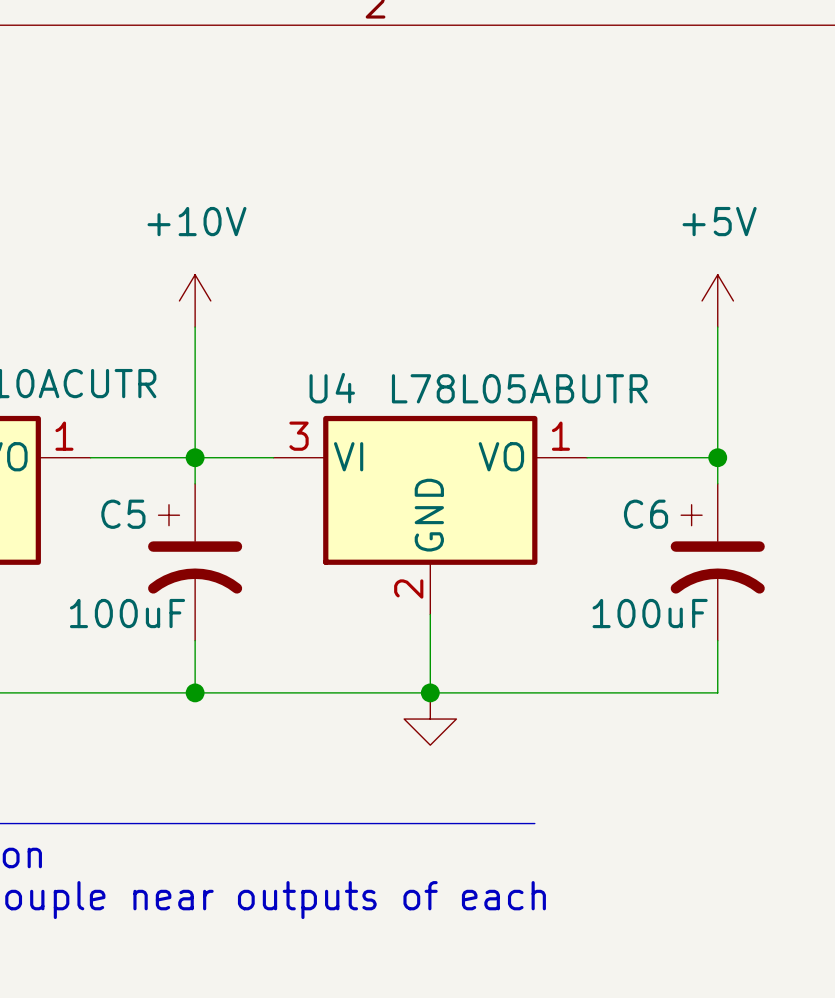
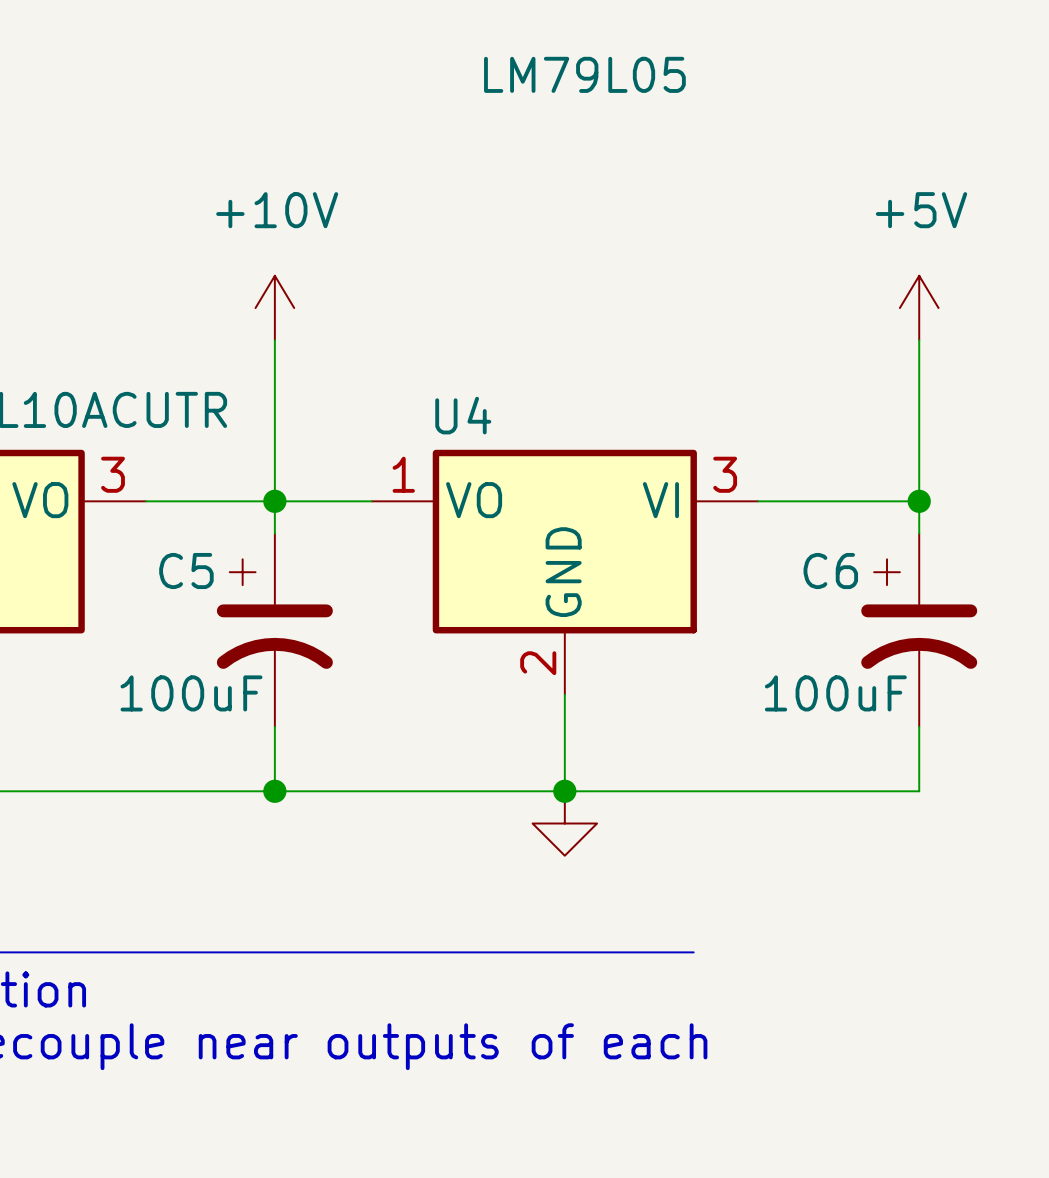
U4 value: L78L05ABUTR (519, 388) -> LM79L05 (584, 74)
part pin number: 1 (64, 436) -> 3 (113, 474)
U4 flip: as is (430, 490) -> left-right (564, 541)

